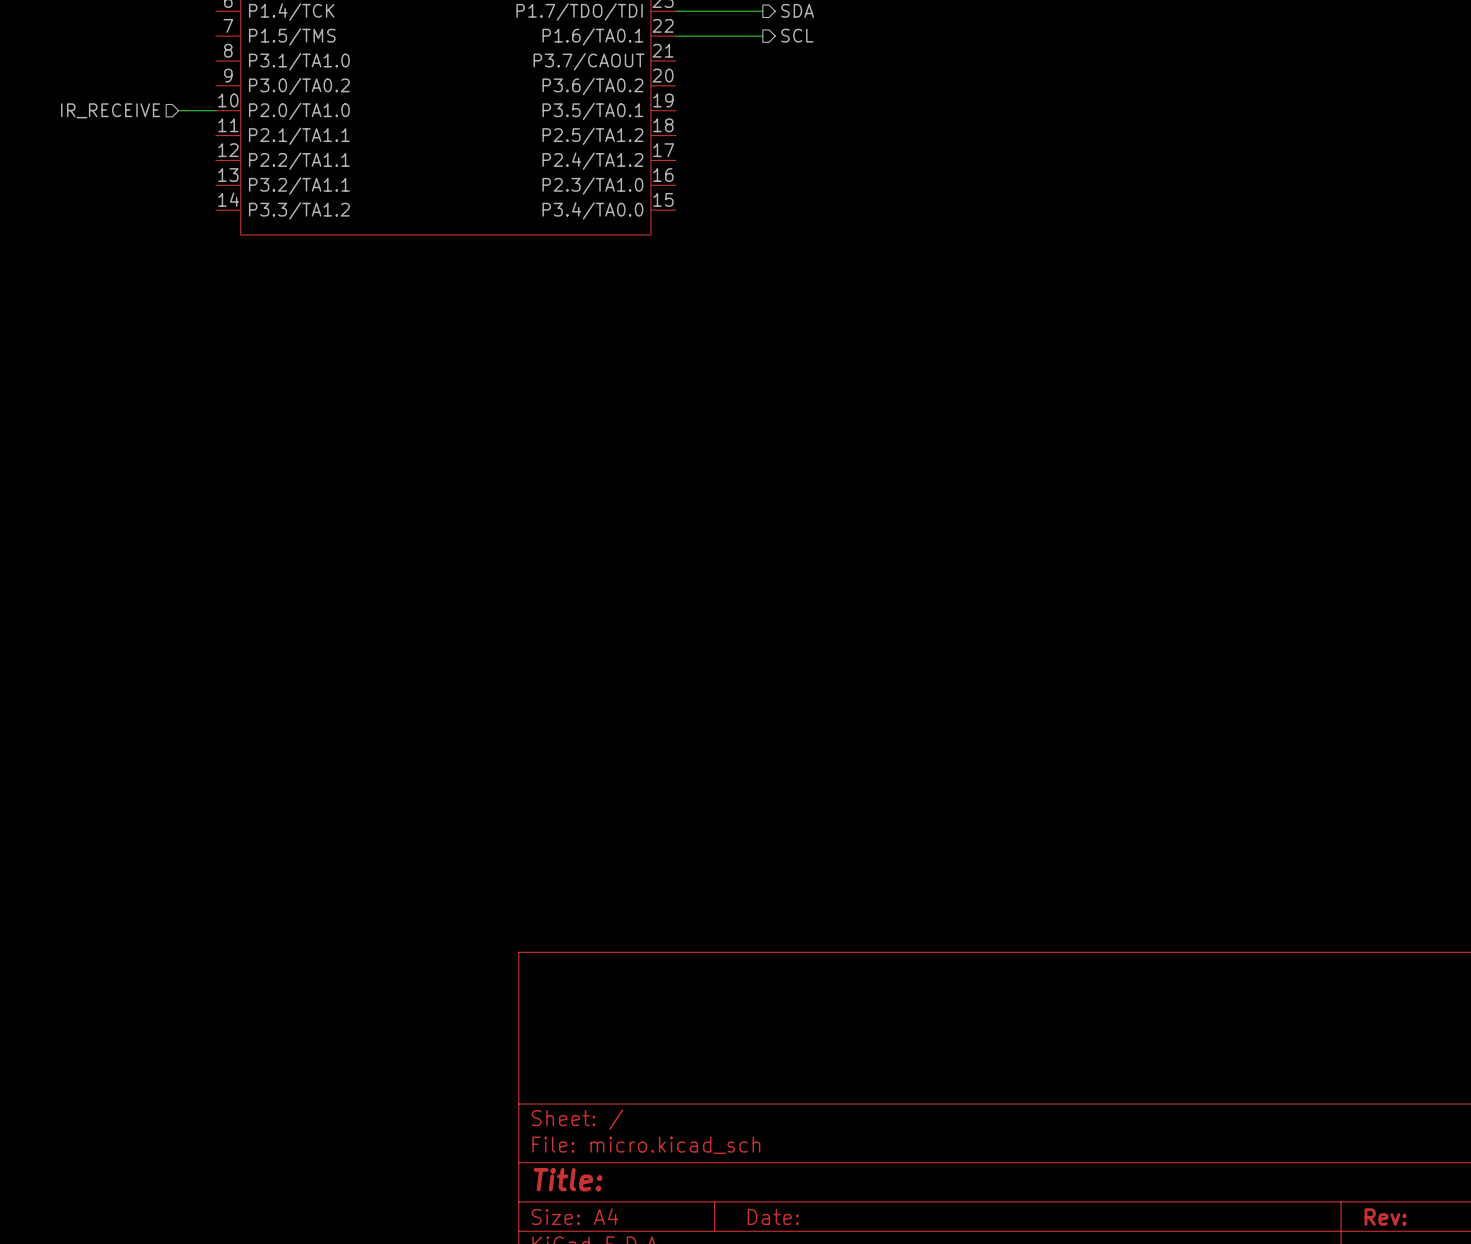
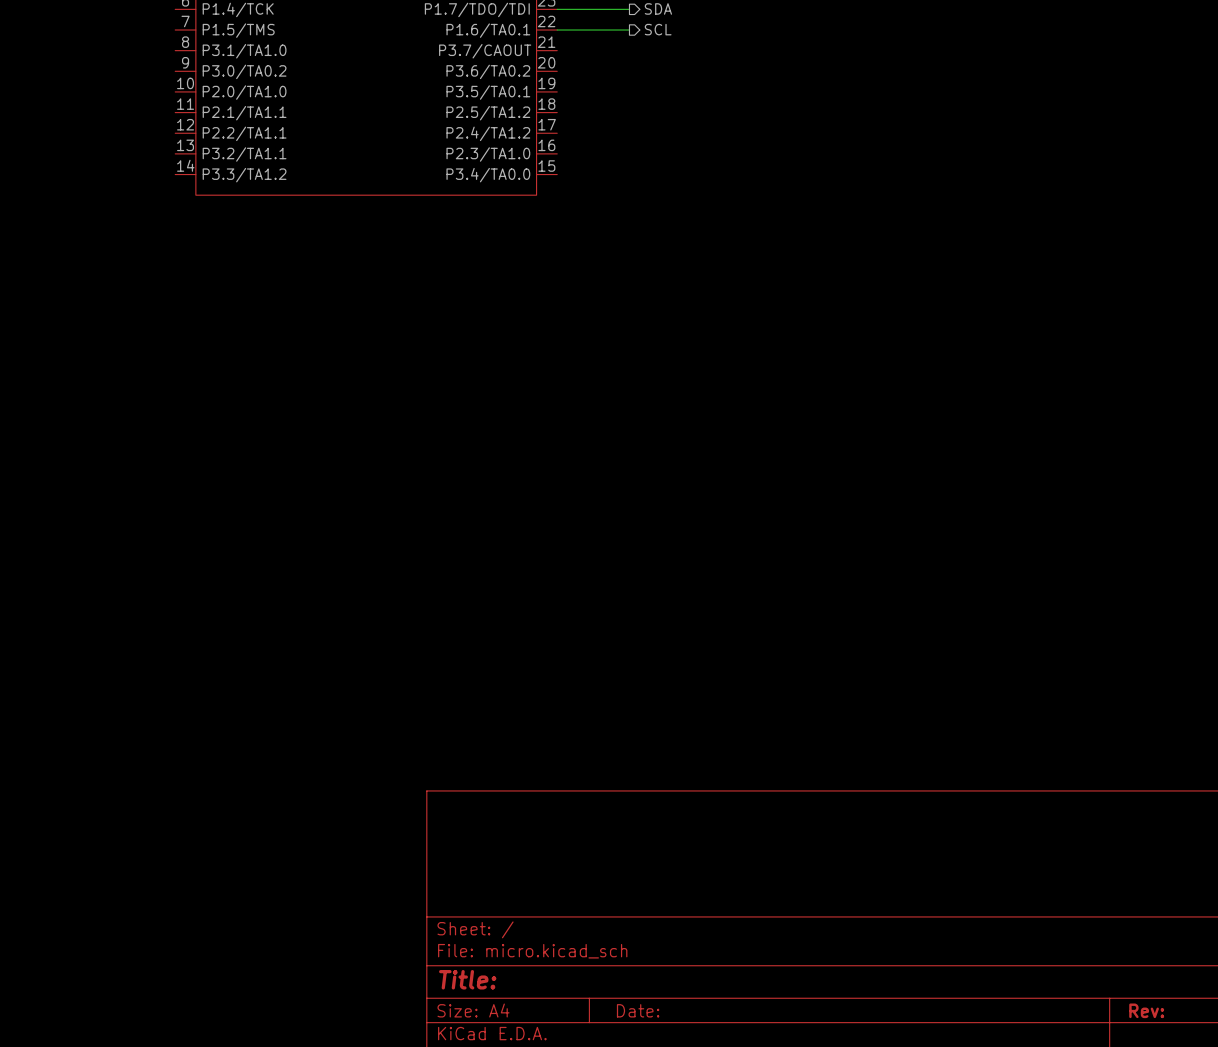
hierarchical label: IR_RECEIVE (110, 110) -> none
wire: (178, 110) (215, 110) -> none

